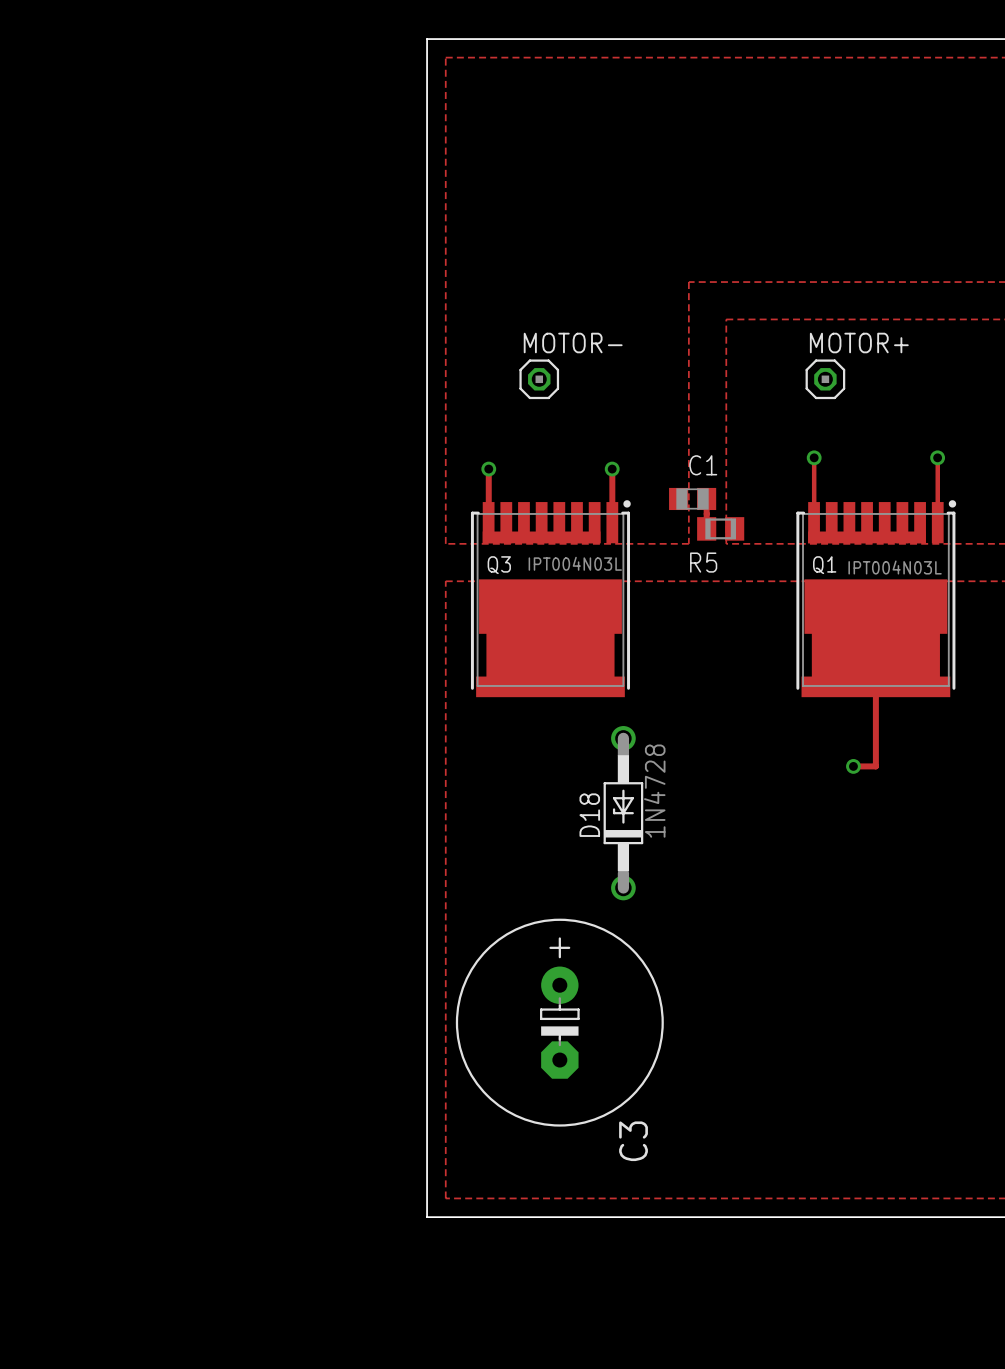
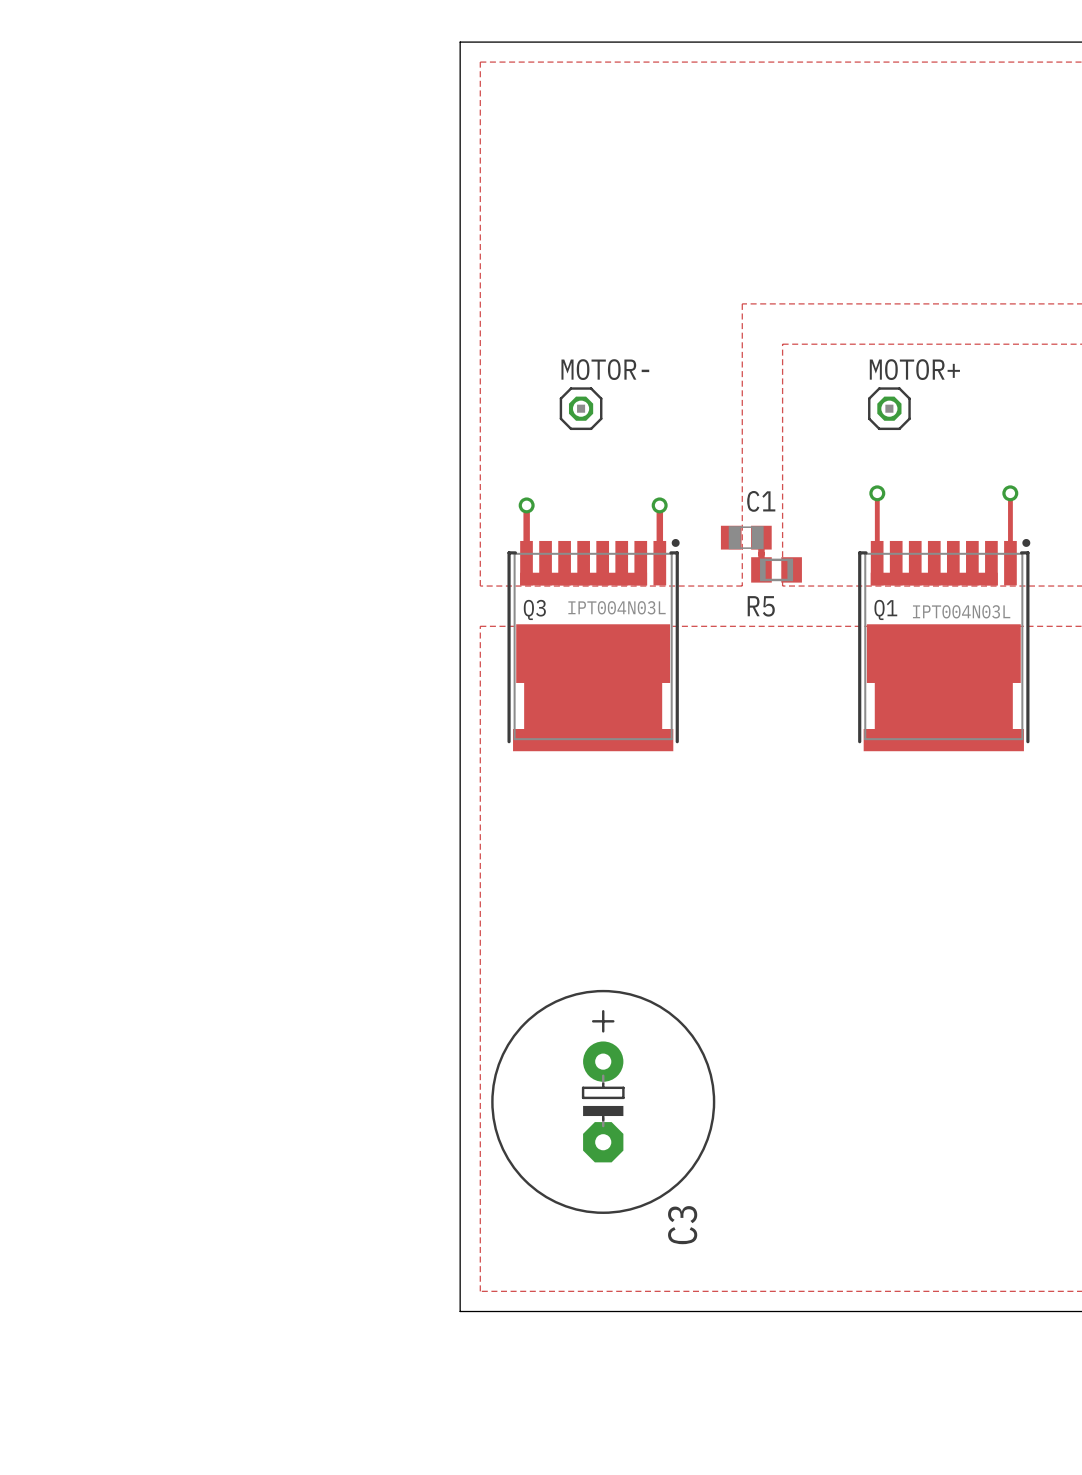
track: (875, 677) (875, 766) (853, 766) -> none
via: (853, 766) -> none
D18: 1N4728 (623, 813) -> none

